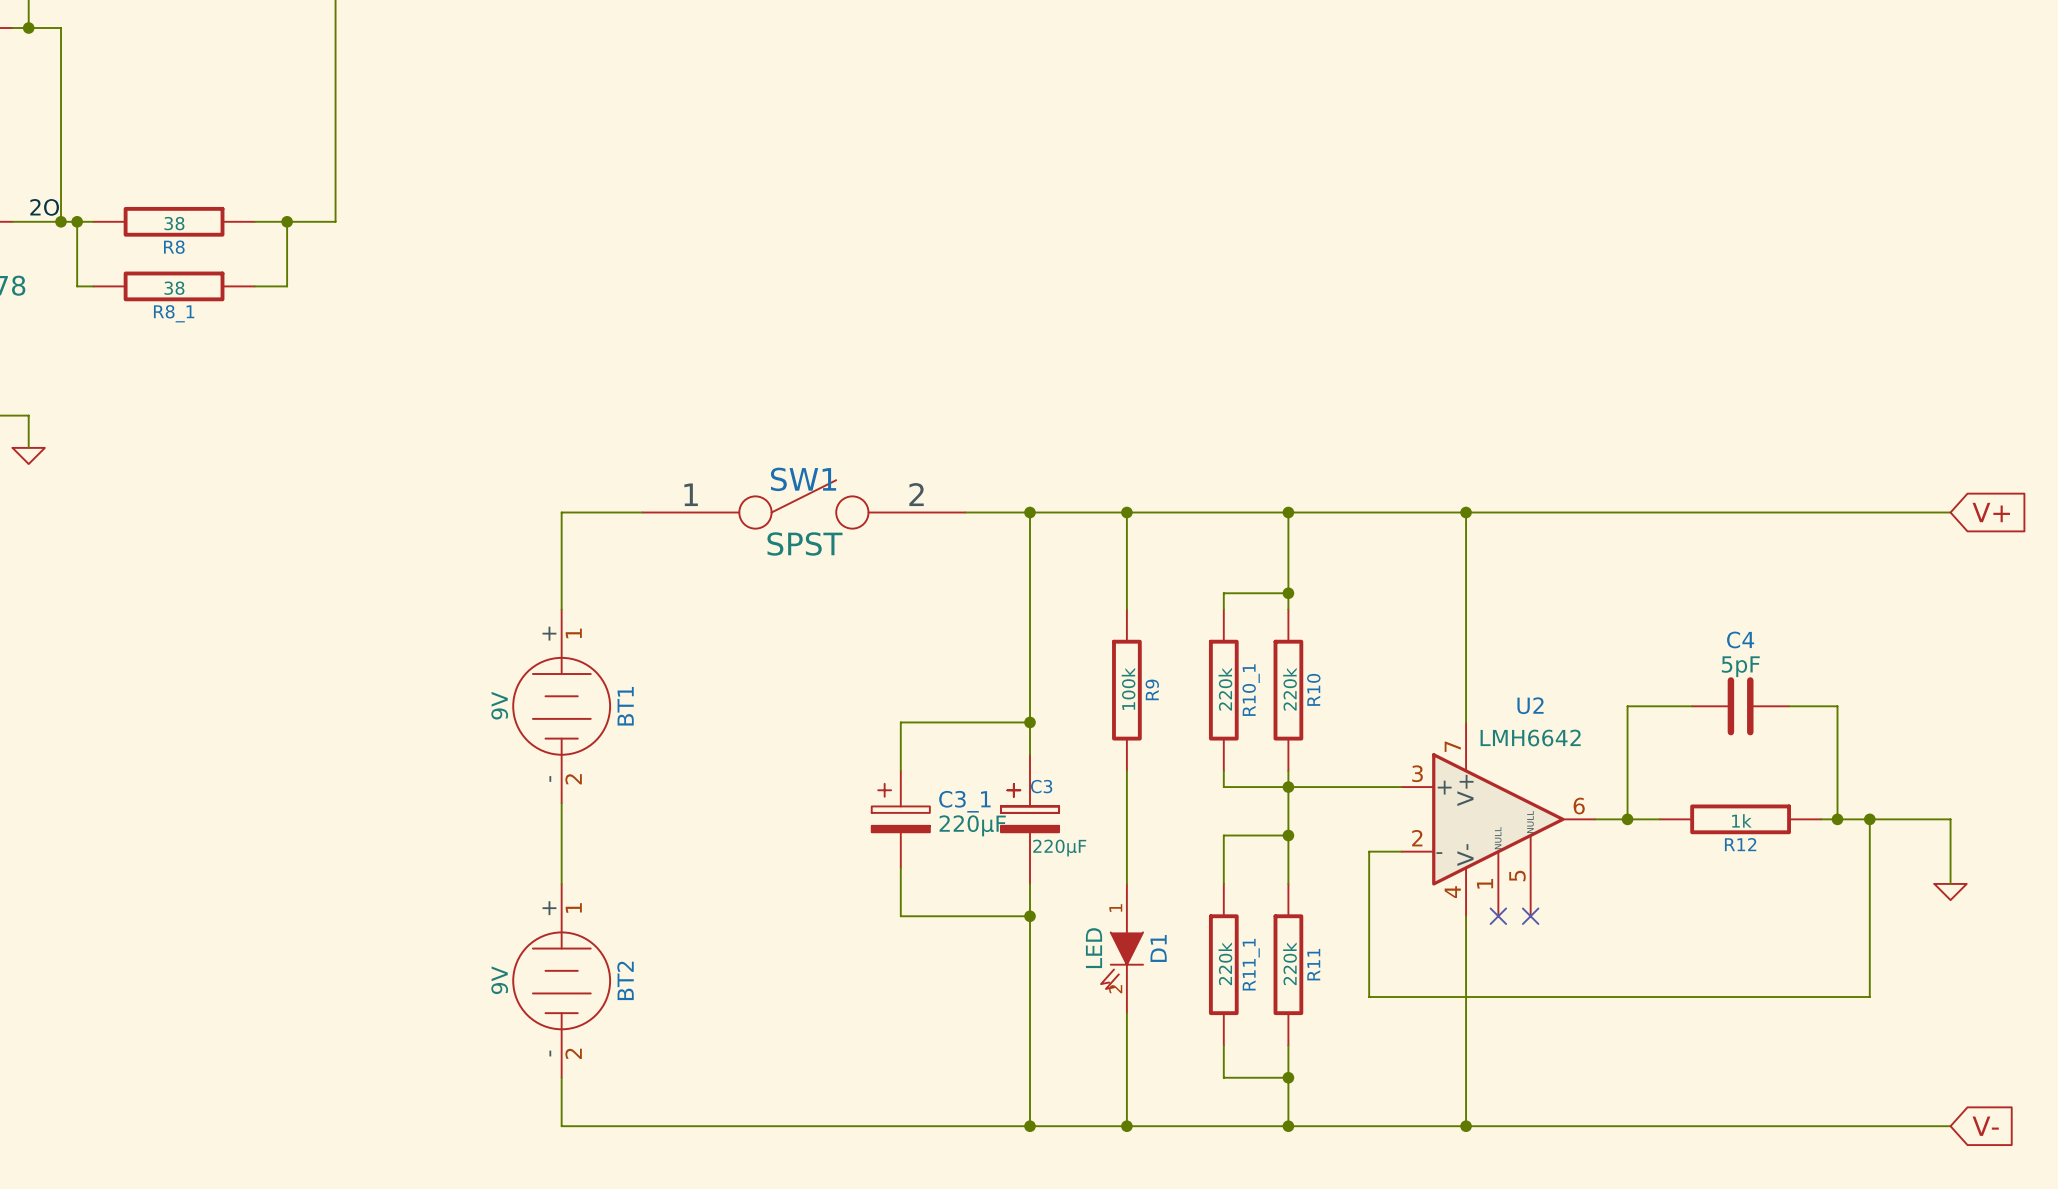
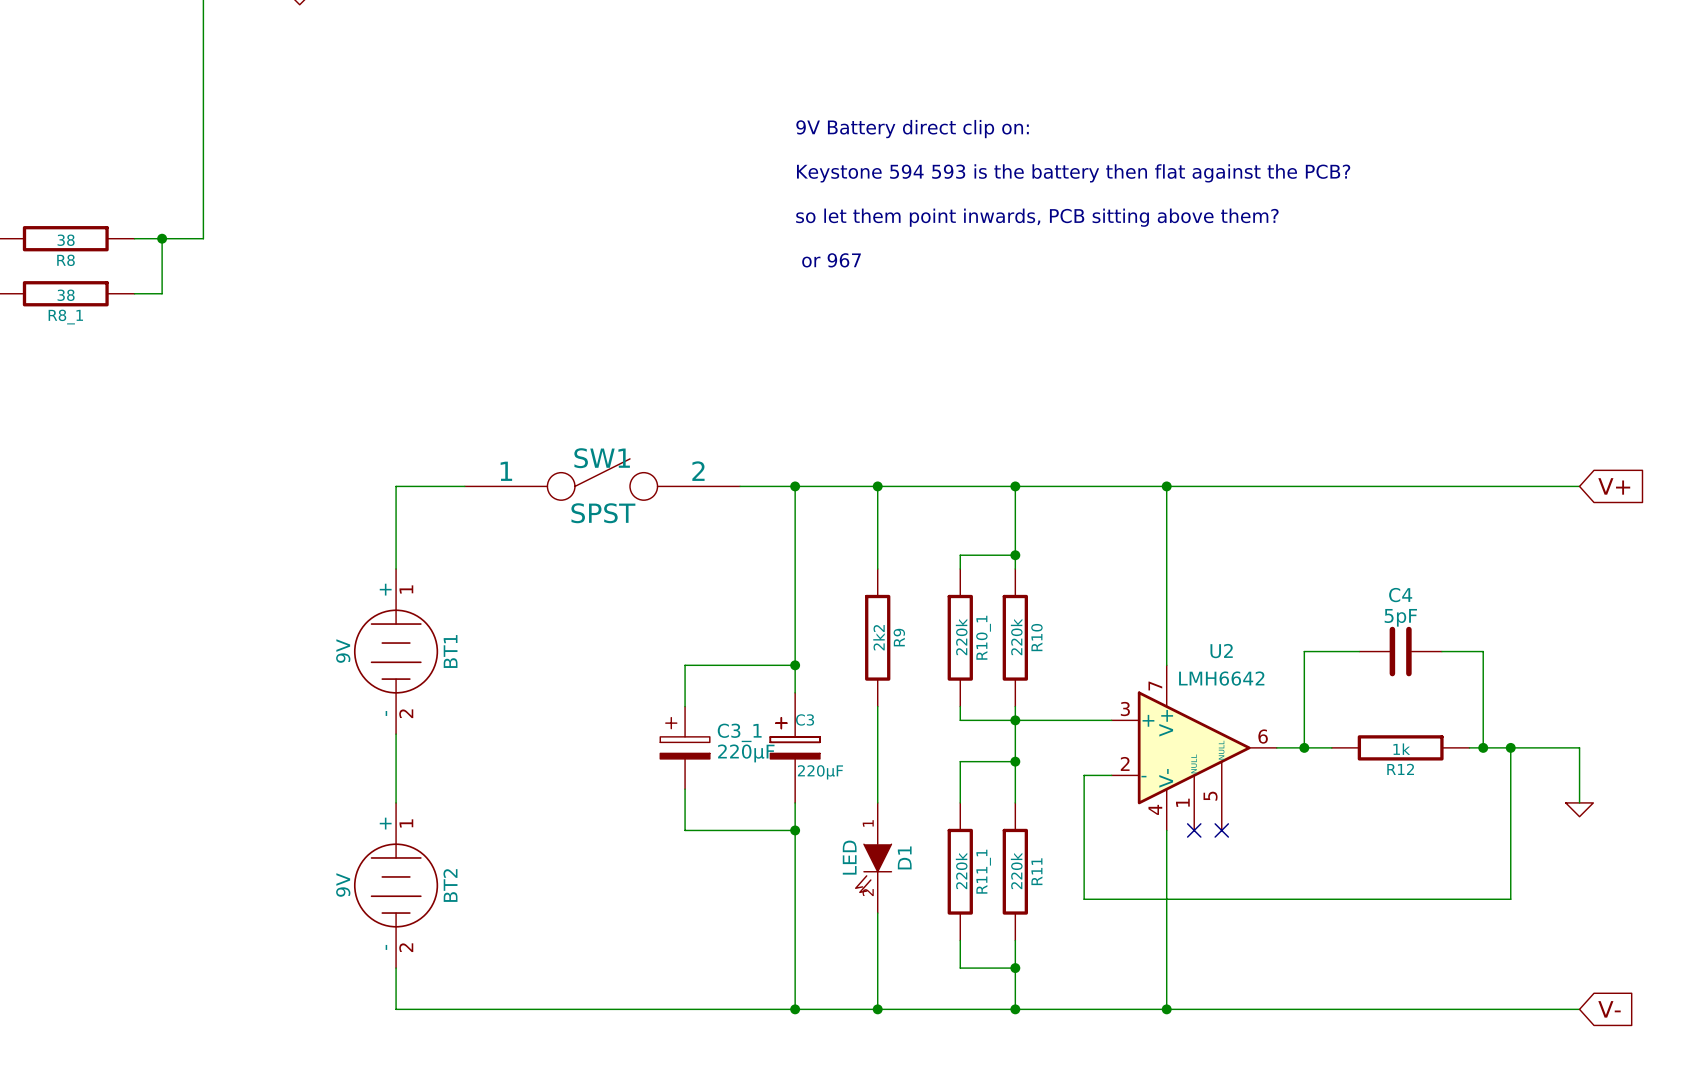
text: none -> 9V Battery direct clip on: (912, 129)
text: none -> Keystone 594 593 is the battery then flat against the PCB? (1073, 173)
text: none -> so let them point inwards, PCB sitting above them? (1037, 217)
text: none -> or 967 (831, 260)
R9 value: 100k (1128, 688) -> 2k2 (878, 637)

